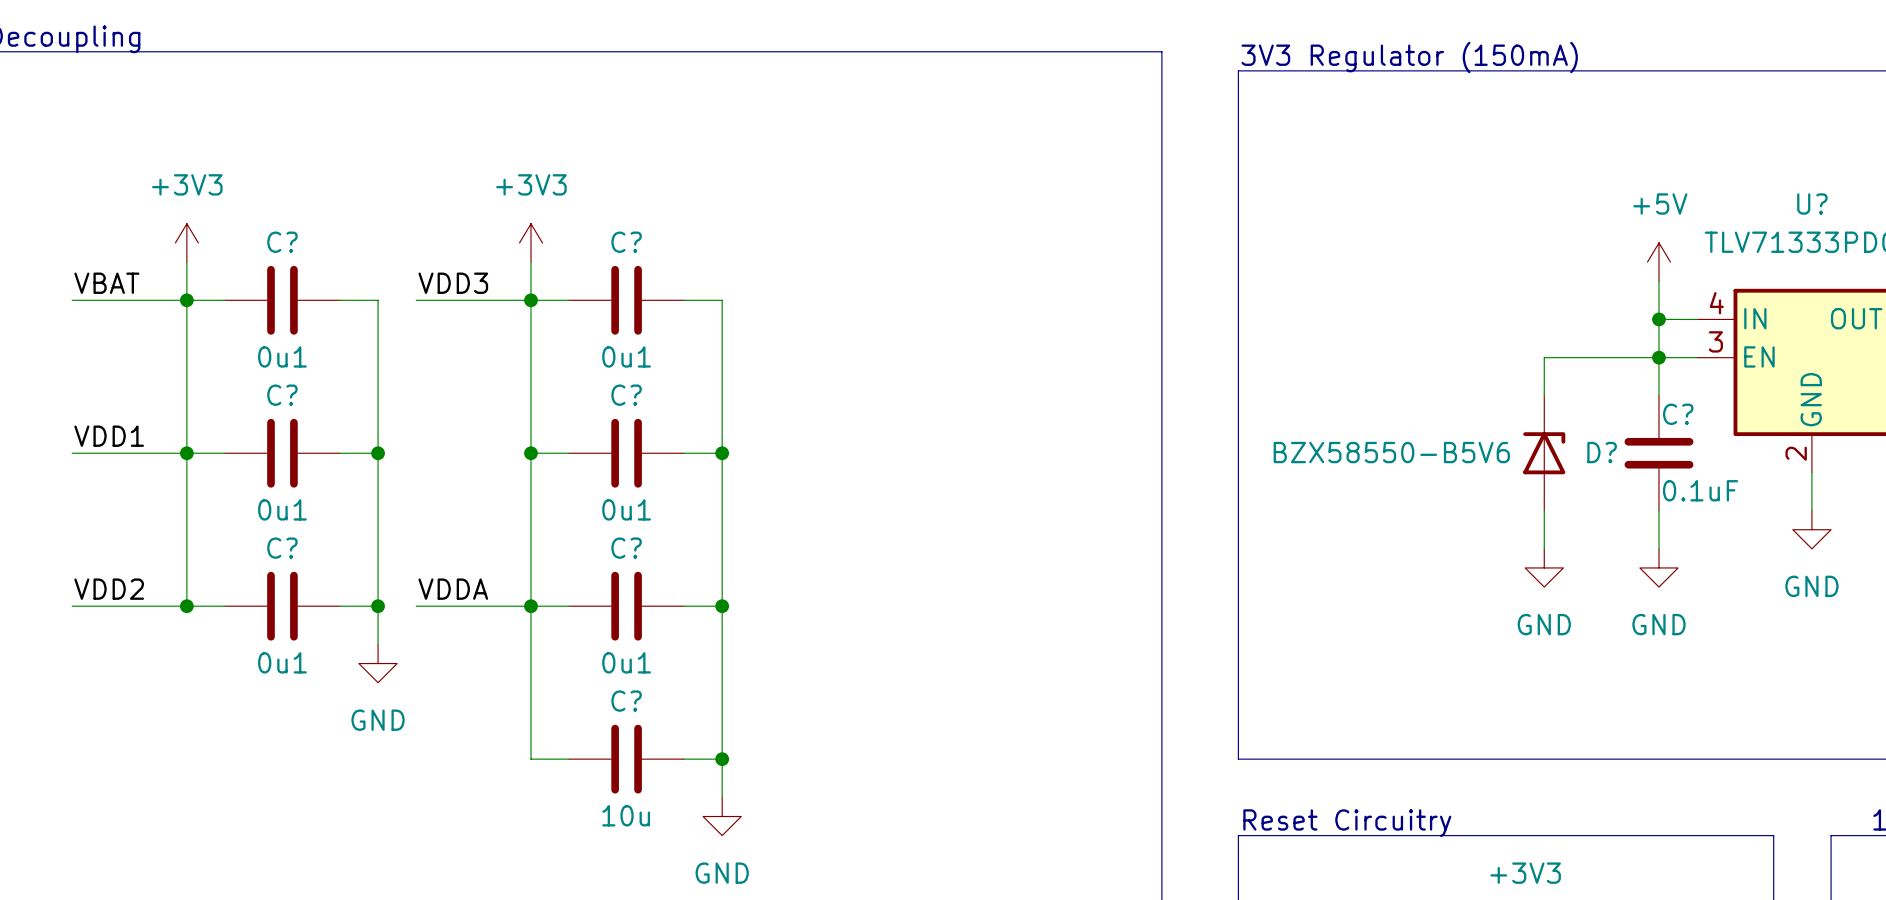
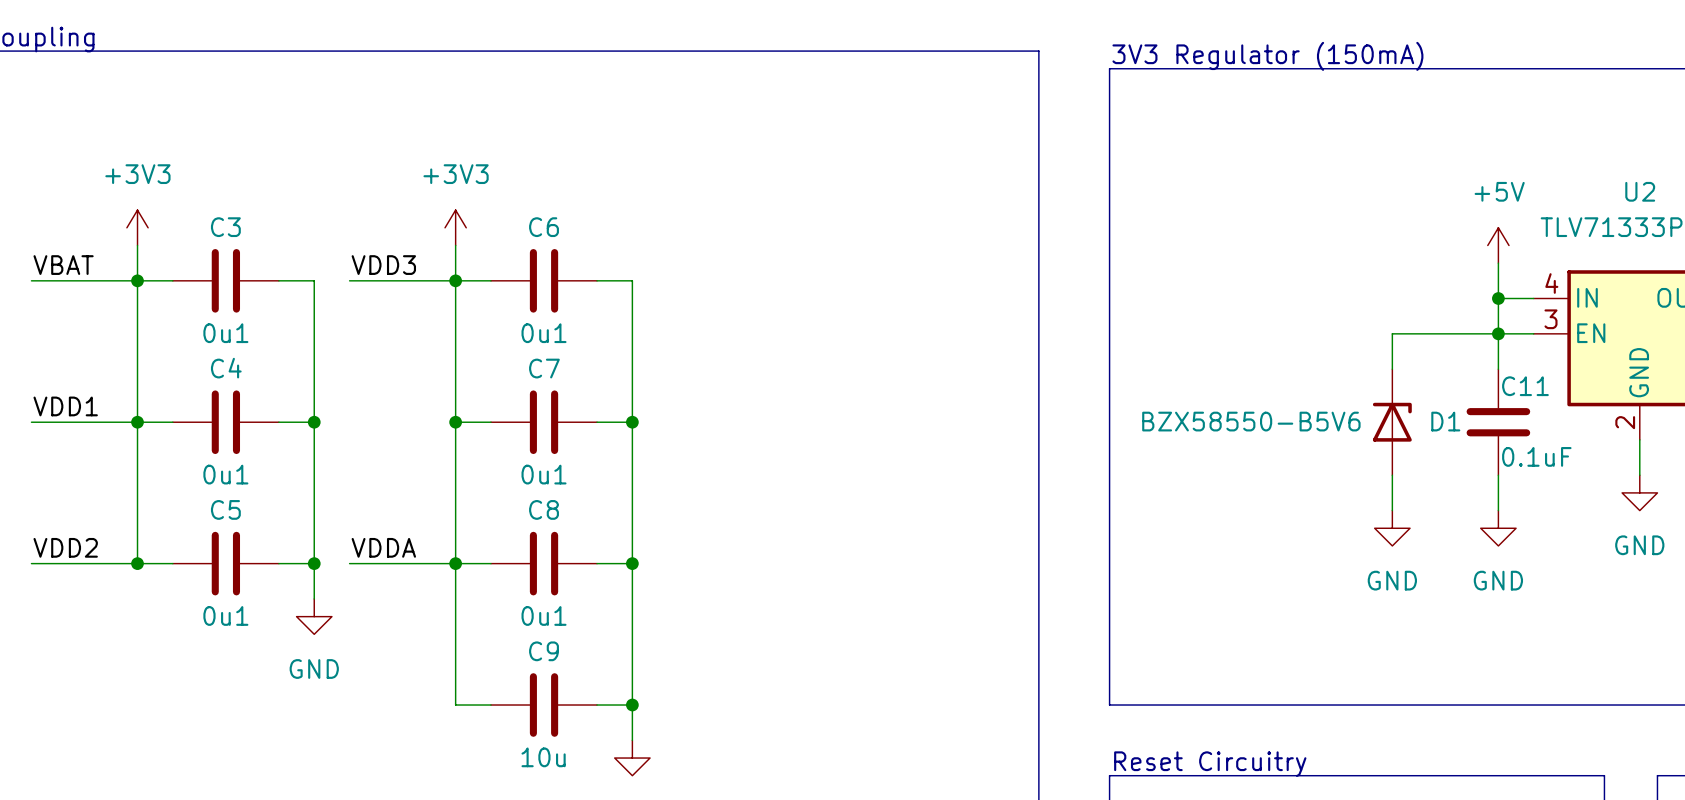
U? name: U? (1812, 203) -> U2 (1640, 191)
C? name: C? (282, 242) -> C3 (225, 227)
C? name: C? (626, 242) -> C6 (544, 227)
C? name: C? (282, 395) -> C4 (226, 368)
C? name: C? (626, 395) -> C7 (544, 368)
C? name: C? (1678, 414) -> C11 (1525, 386)
D? name: D? (1602, 452) -> D1 (1445, 421)
C? name: C? (282, 548) -> C5 (225, 509)
C? name: C? (626, 548) -> C8 (544, 509)
C? name: C? (626, 701) -> C9 (544, 651)

